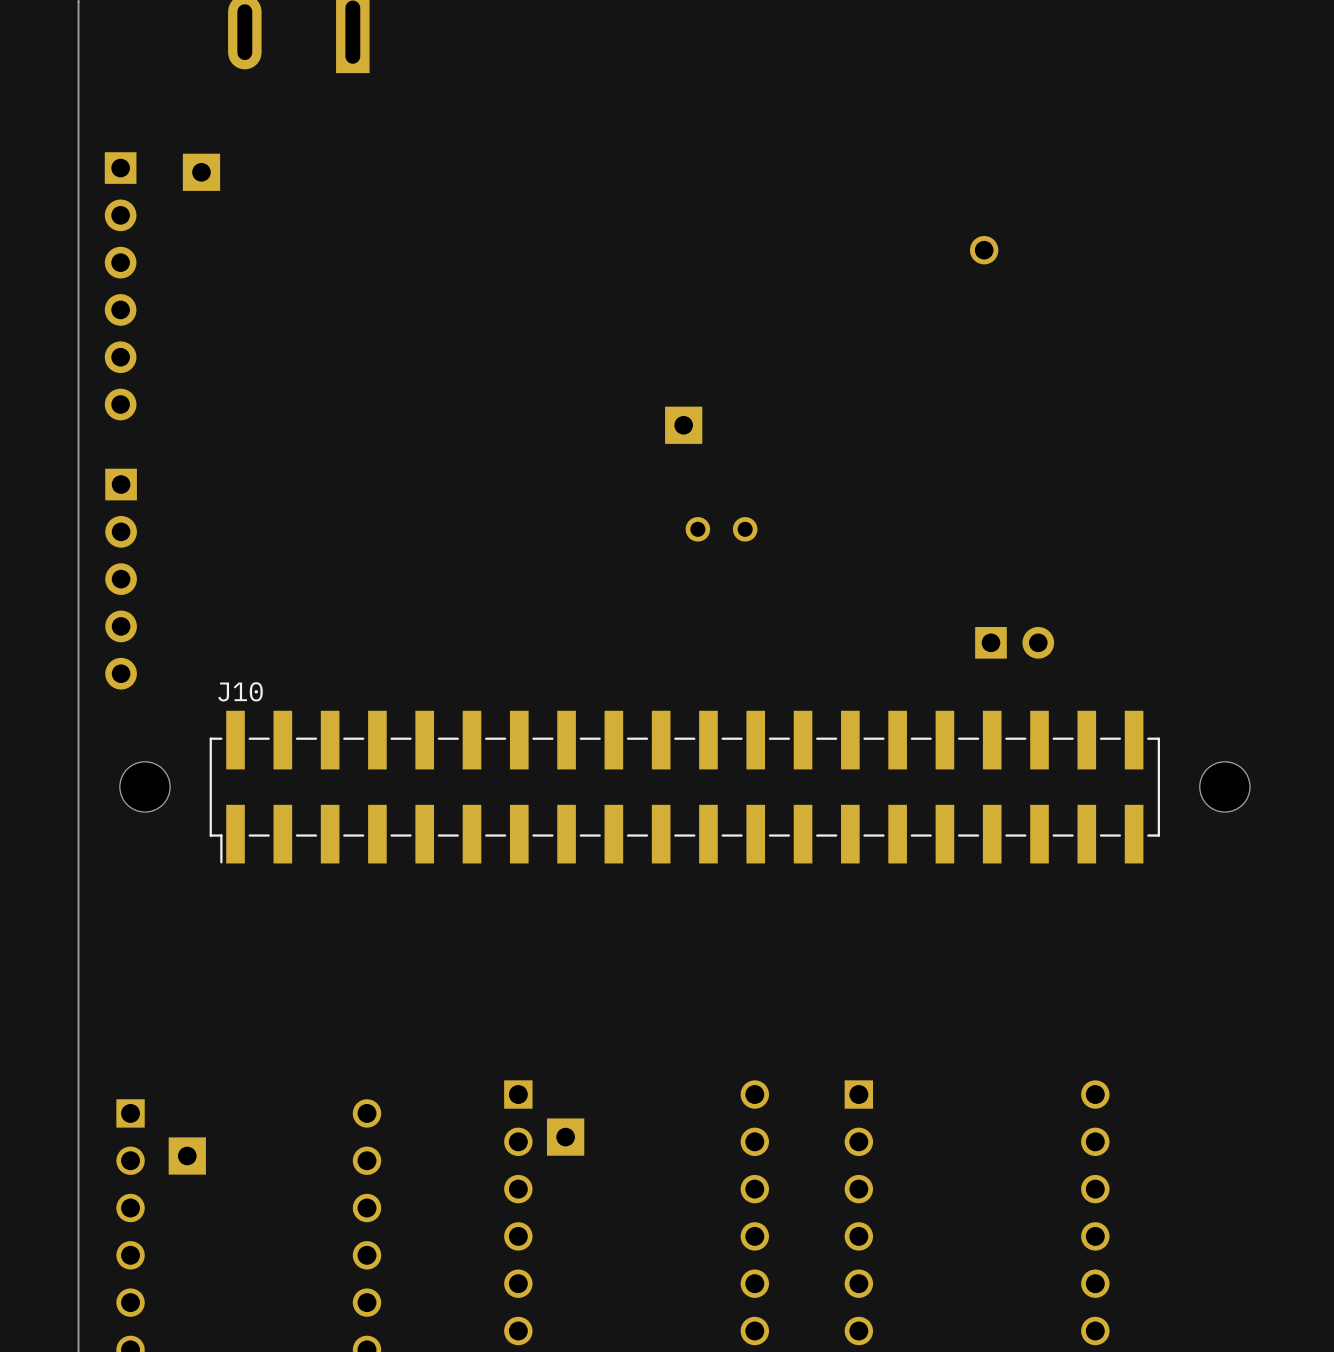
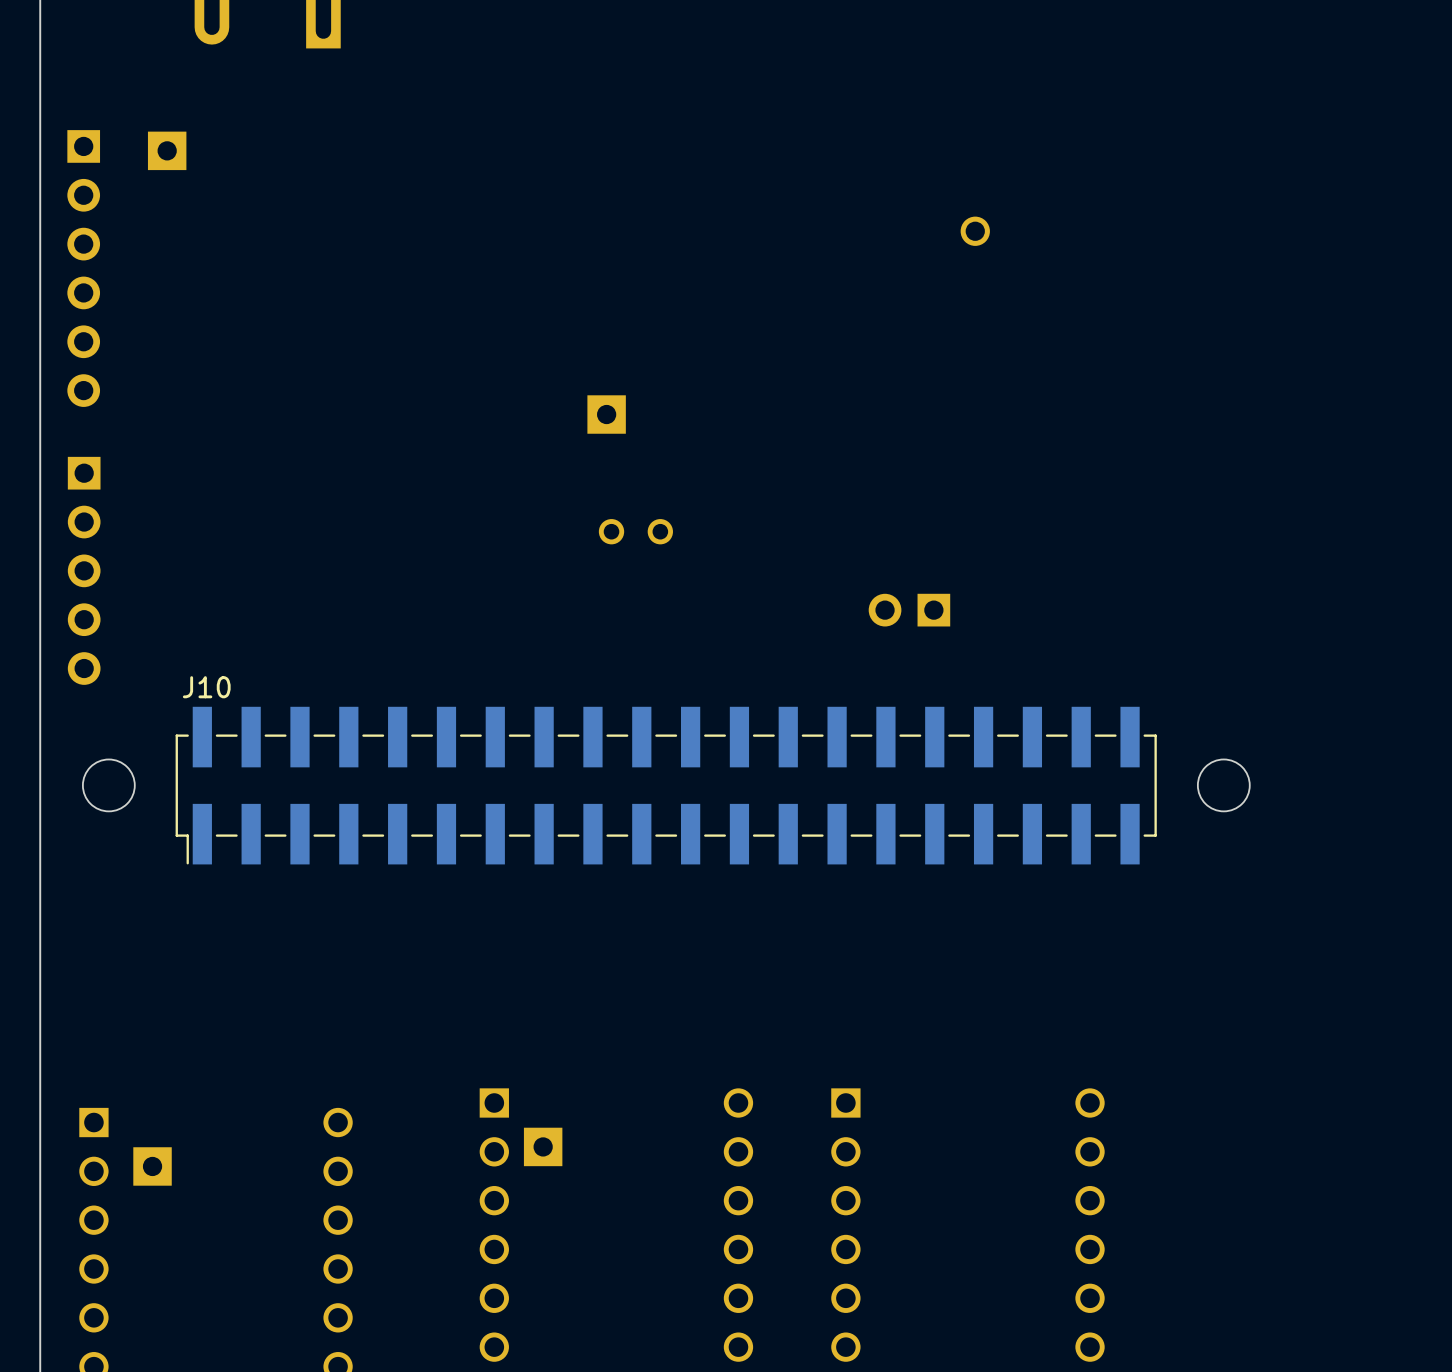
part position: (683, 425) -> (606, 414)
part position: (721, 529) -> (635, 531)
part rotation: 0° (1014, 642) -> 180° (909, 610)
part position: (1014, 642) -> (909, 610)

